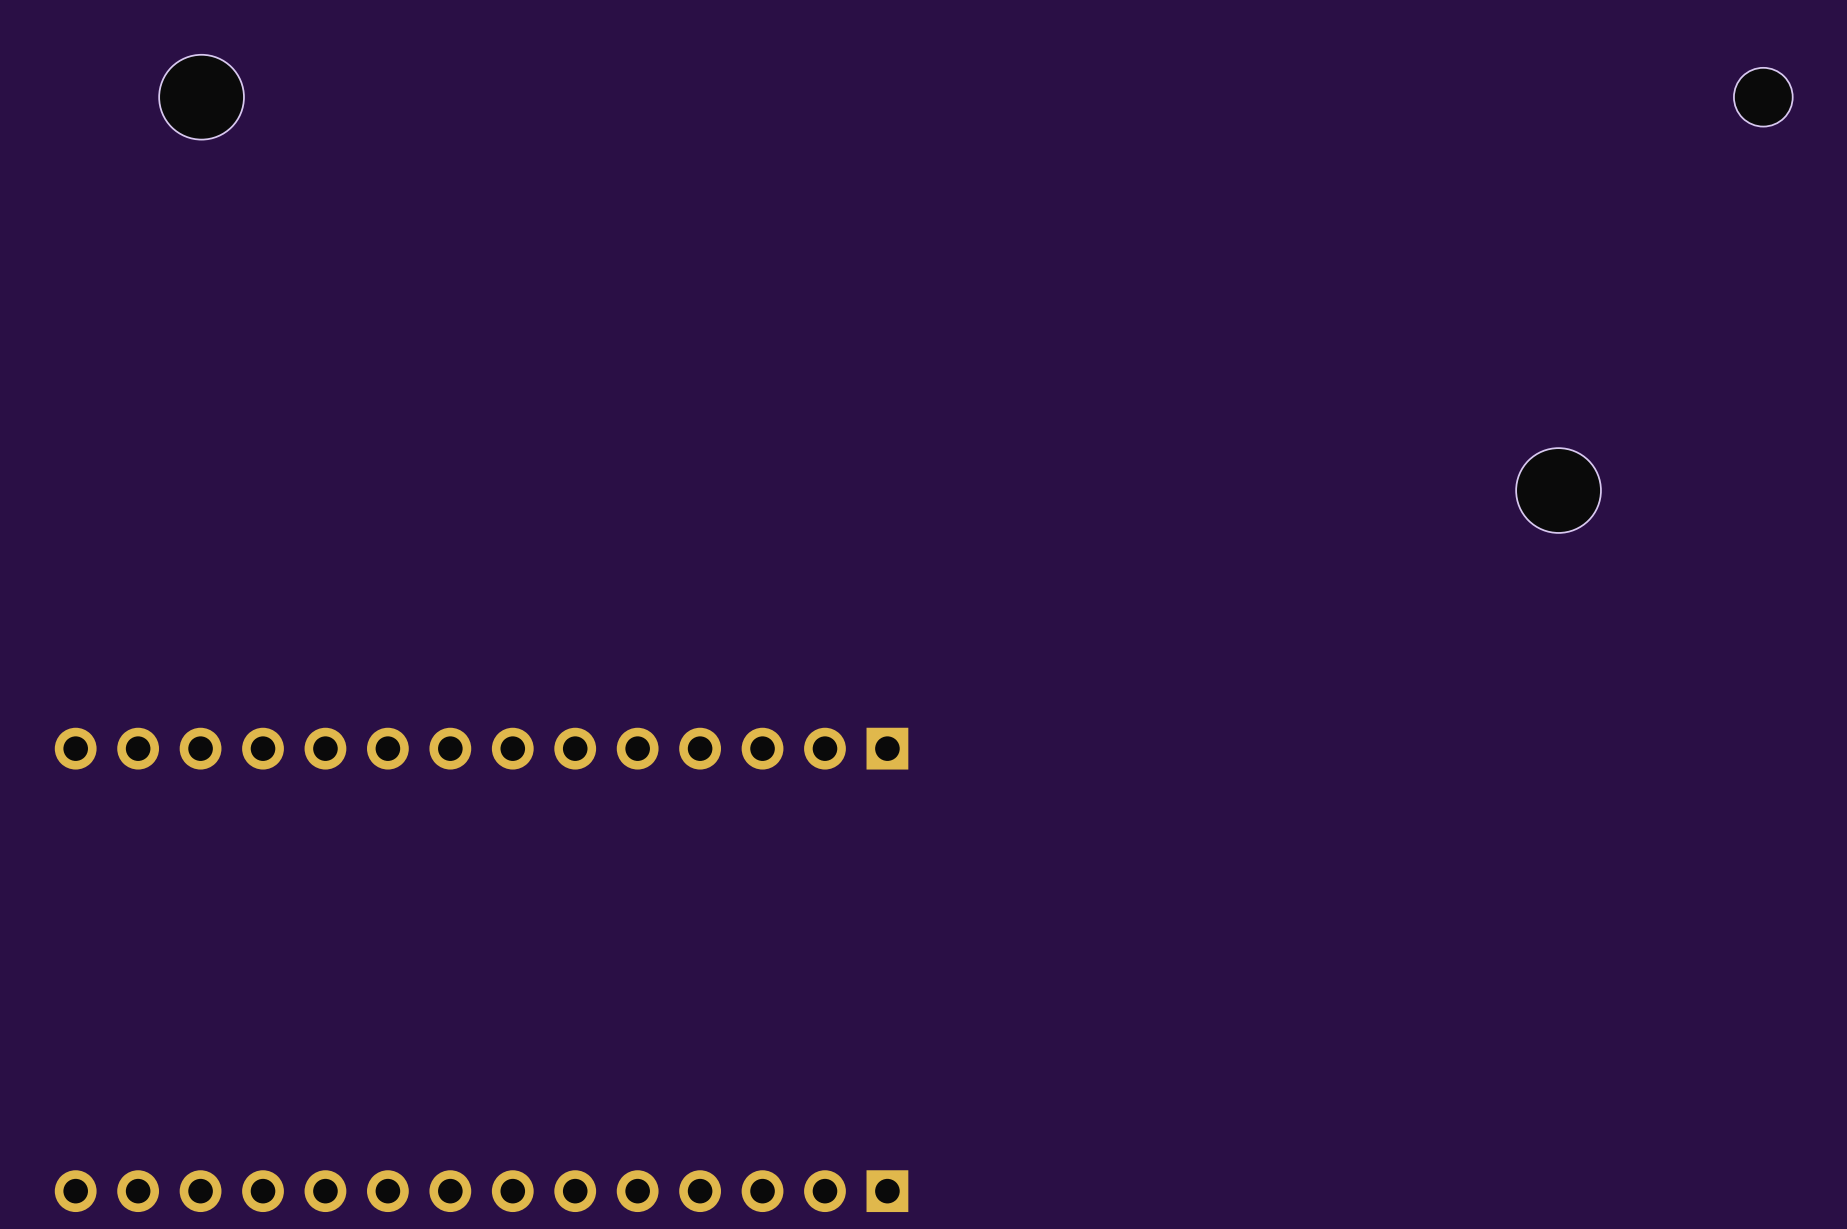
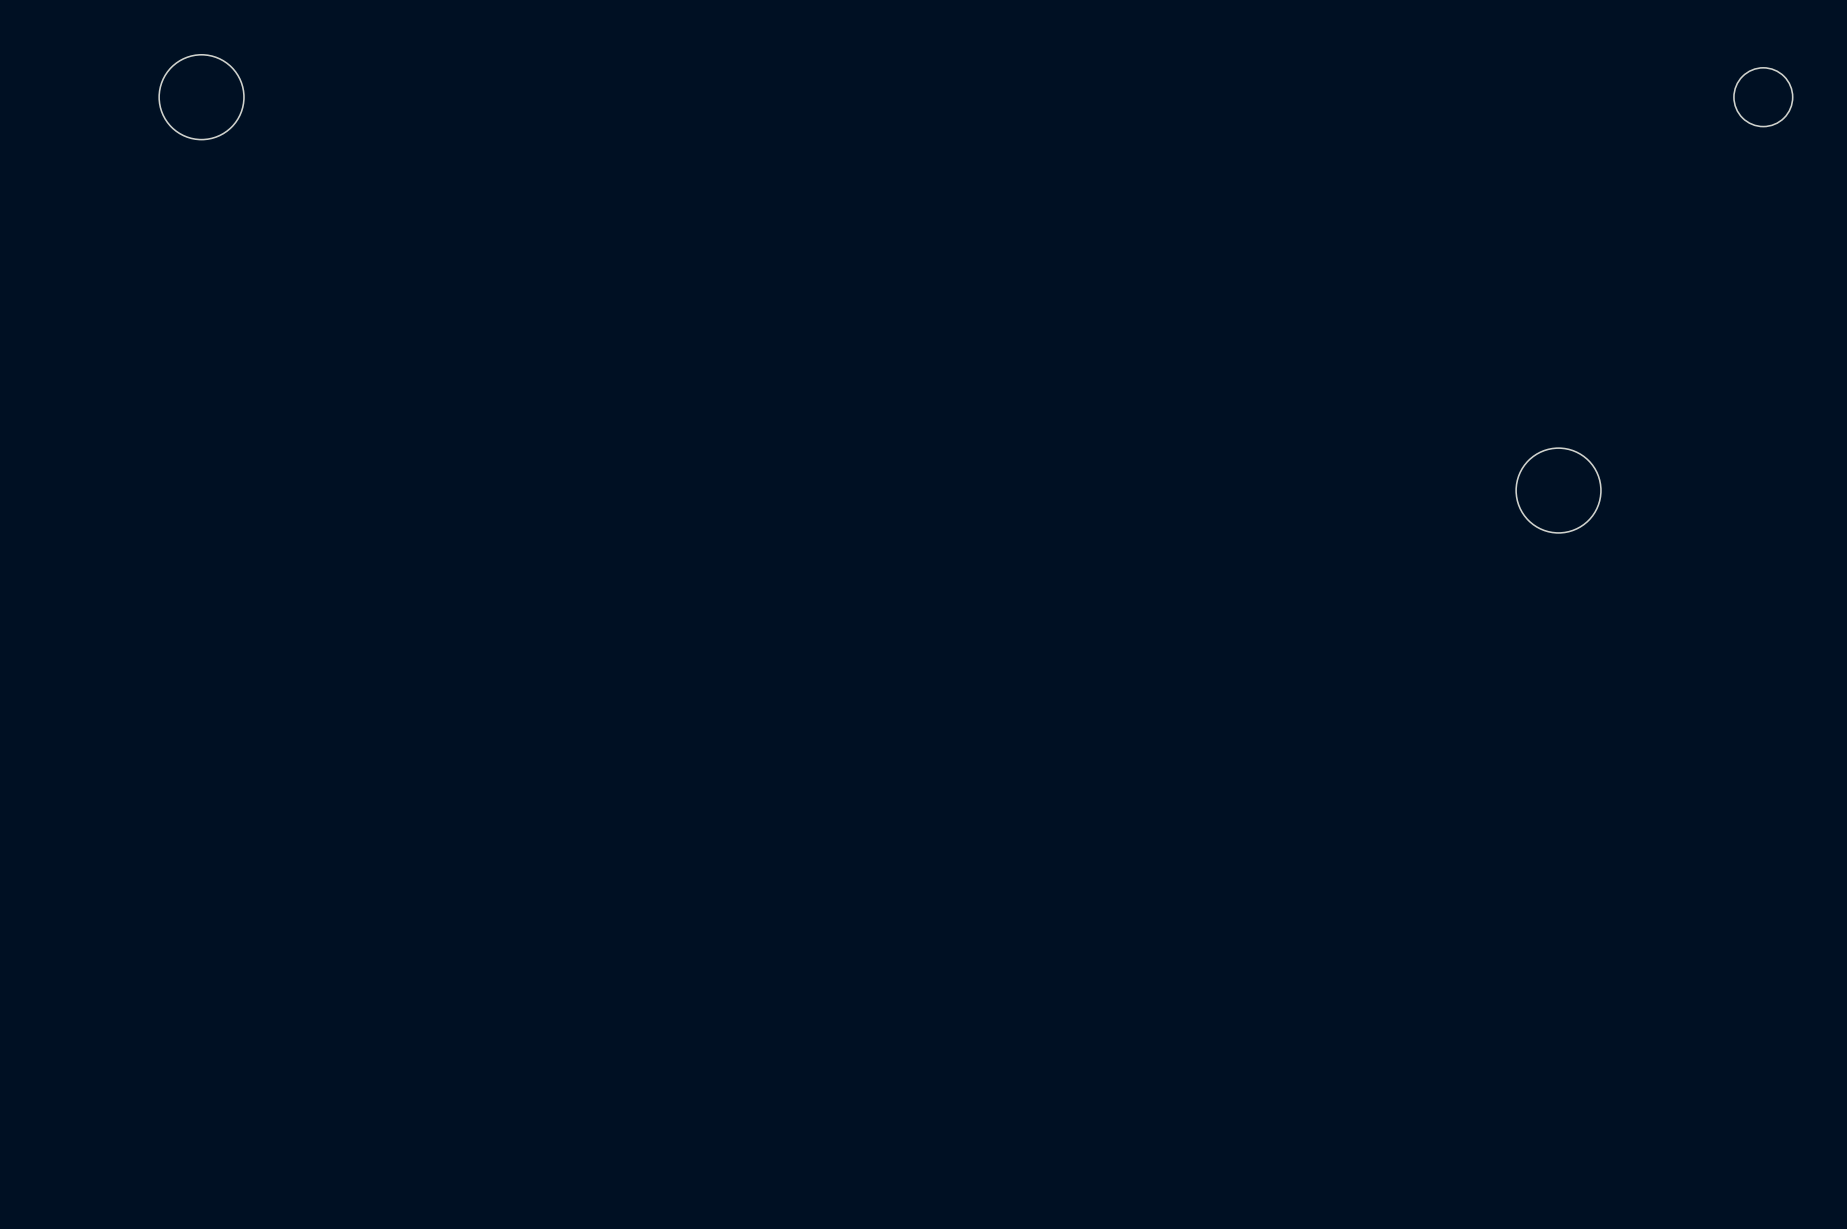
part: (481, 748) -> none
part: (481, 1191) -> none

